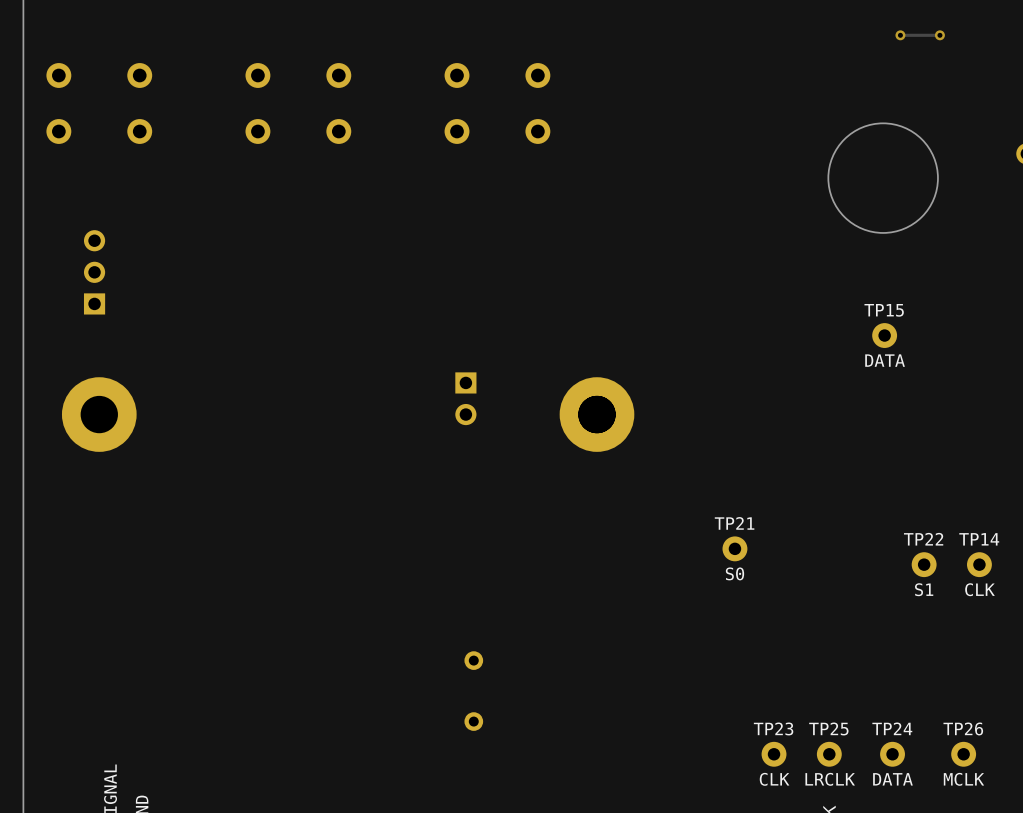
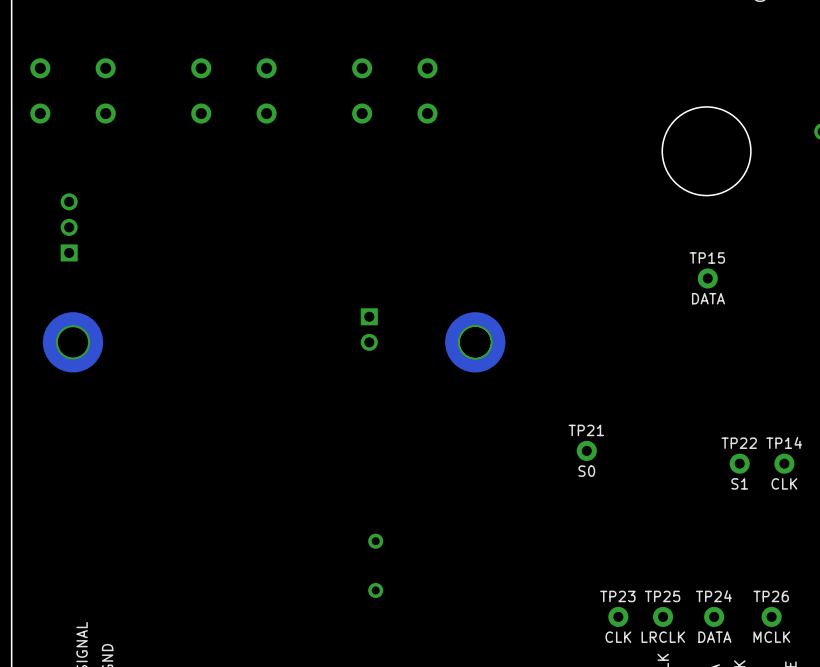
via: (900, 35) -> none
track: (939, 35) (900, 35) -> none
via: (939, 35) -> none

